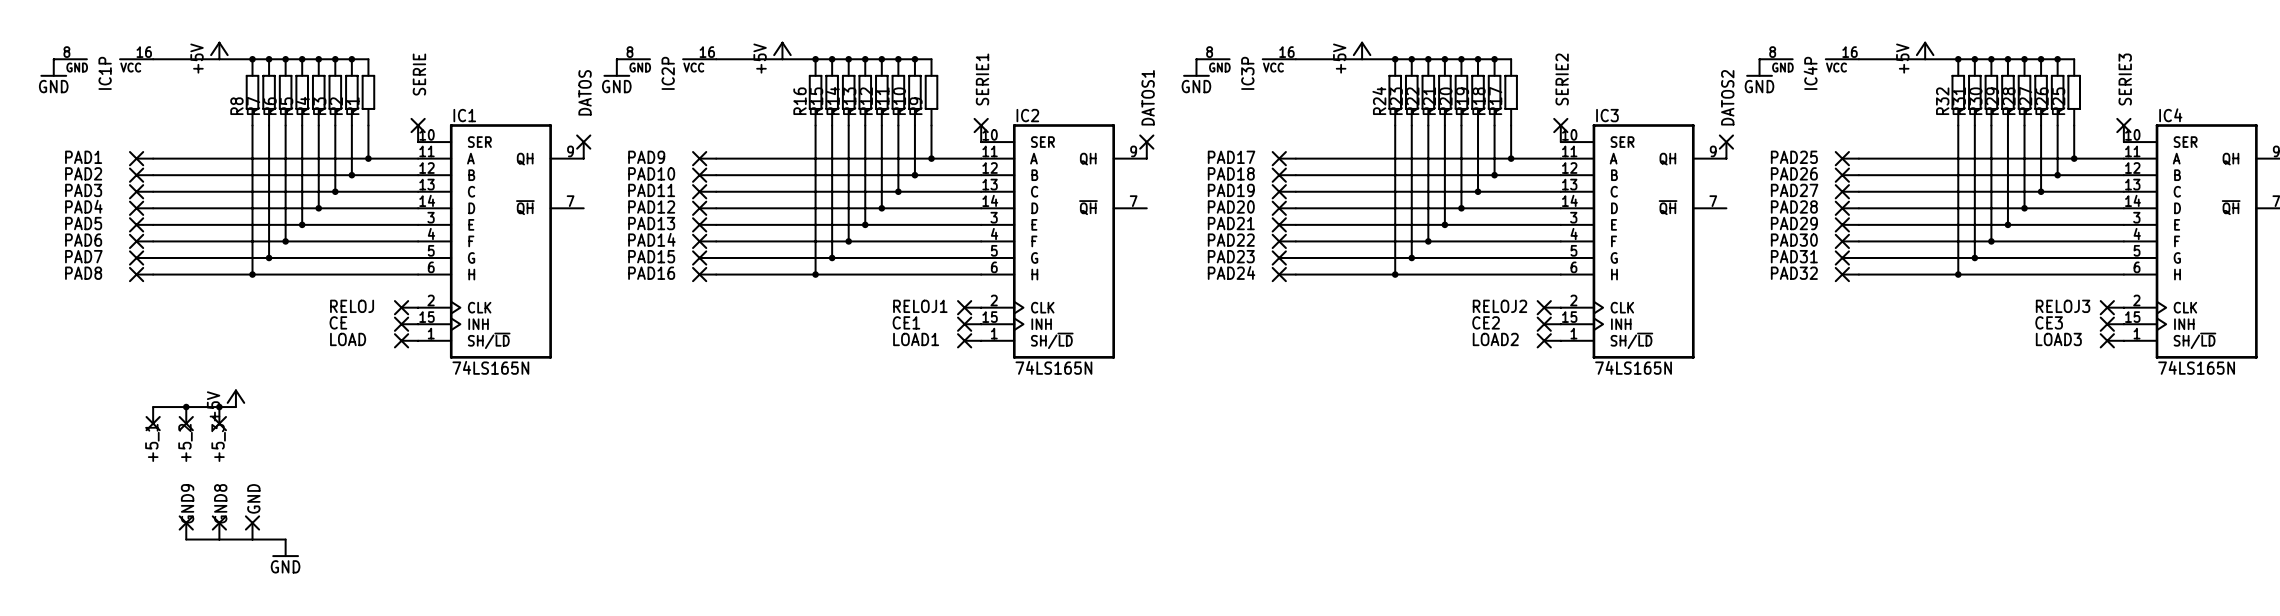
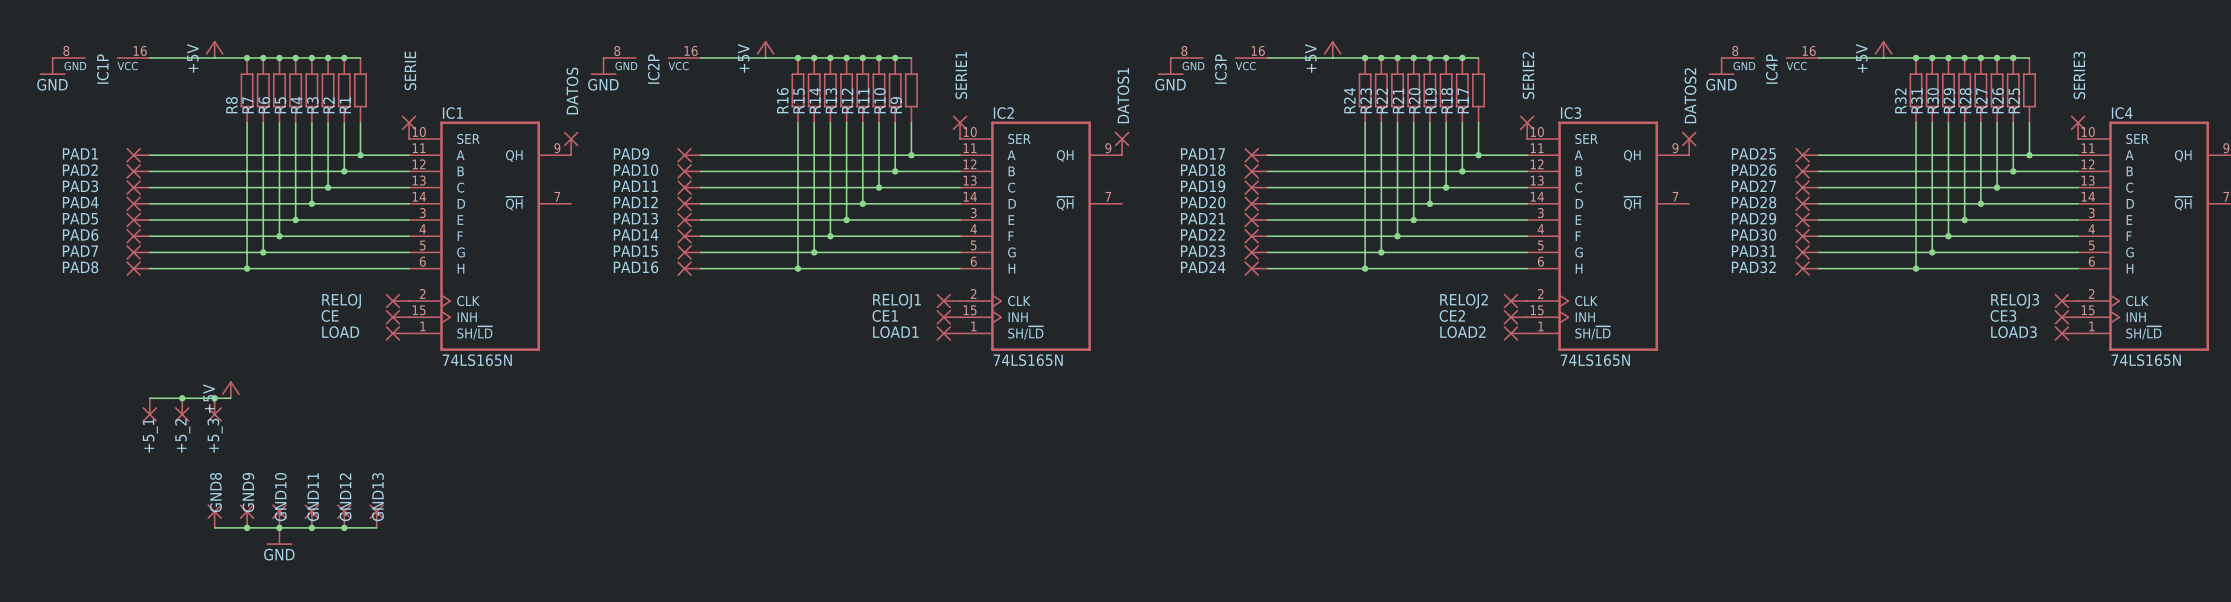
GND name: GND (253, 498) -> GND9 (248, 492)
GND9: (186, 527) -> none
GND10: none -> (279, 516)
GND11: none -> (311, 516)
GND12: none -> (344, 516)
GND13: none -> (376, 516)
wire: (186, 539) (219, 539) -> none
junction: none -> (247, 527)
wire: none -> (279, 527) (376, 527)
junction: none -> (279, 527)
junction: none -> (311, 527)
junction: none -> (344, 527)

